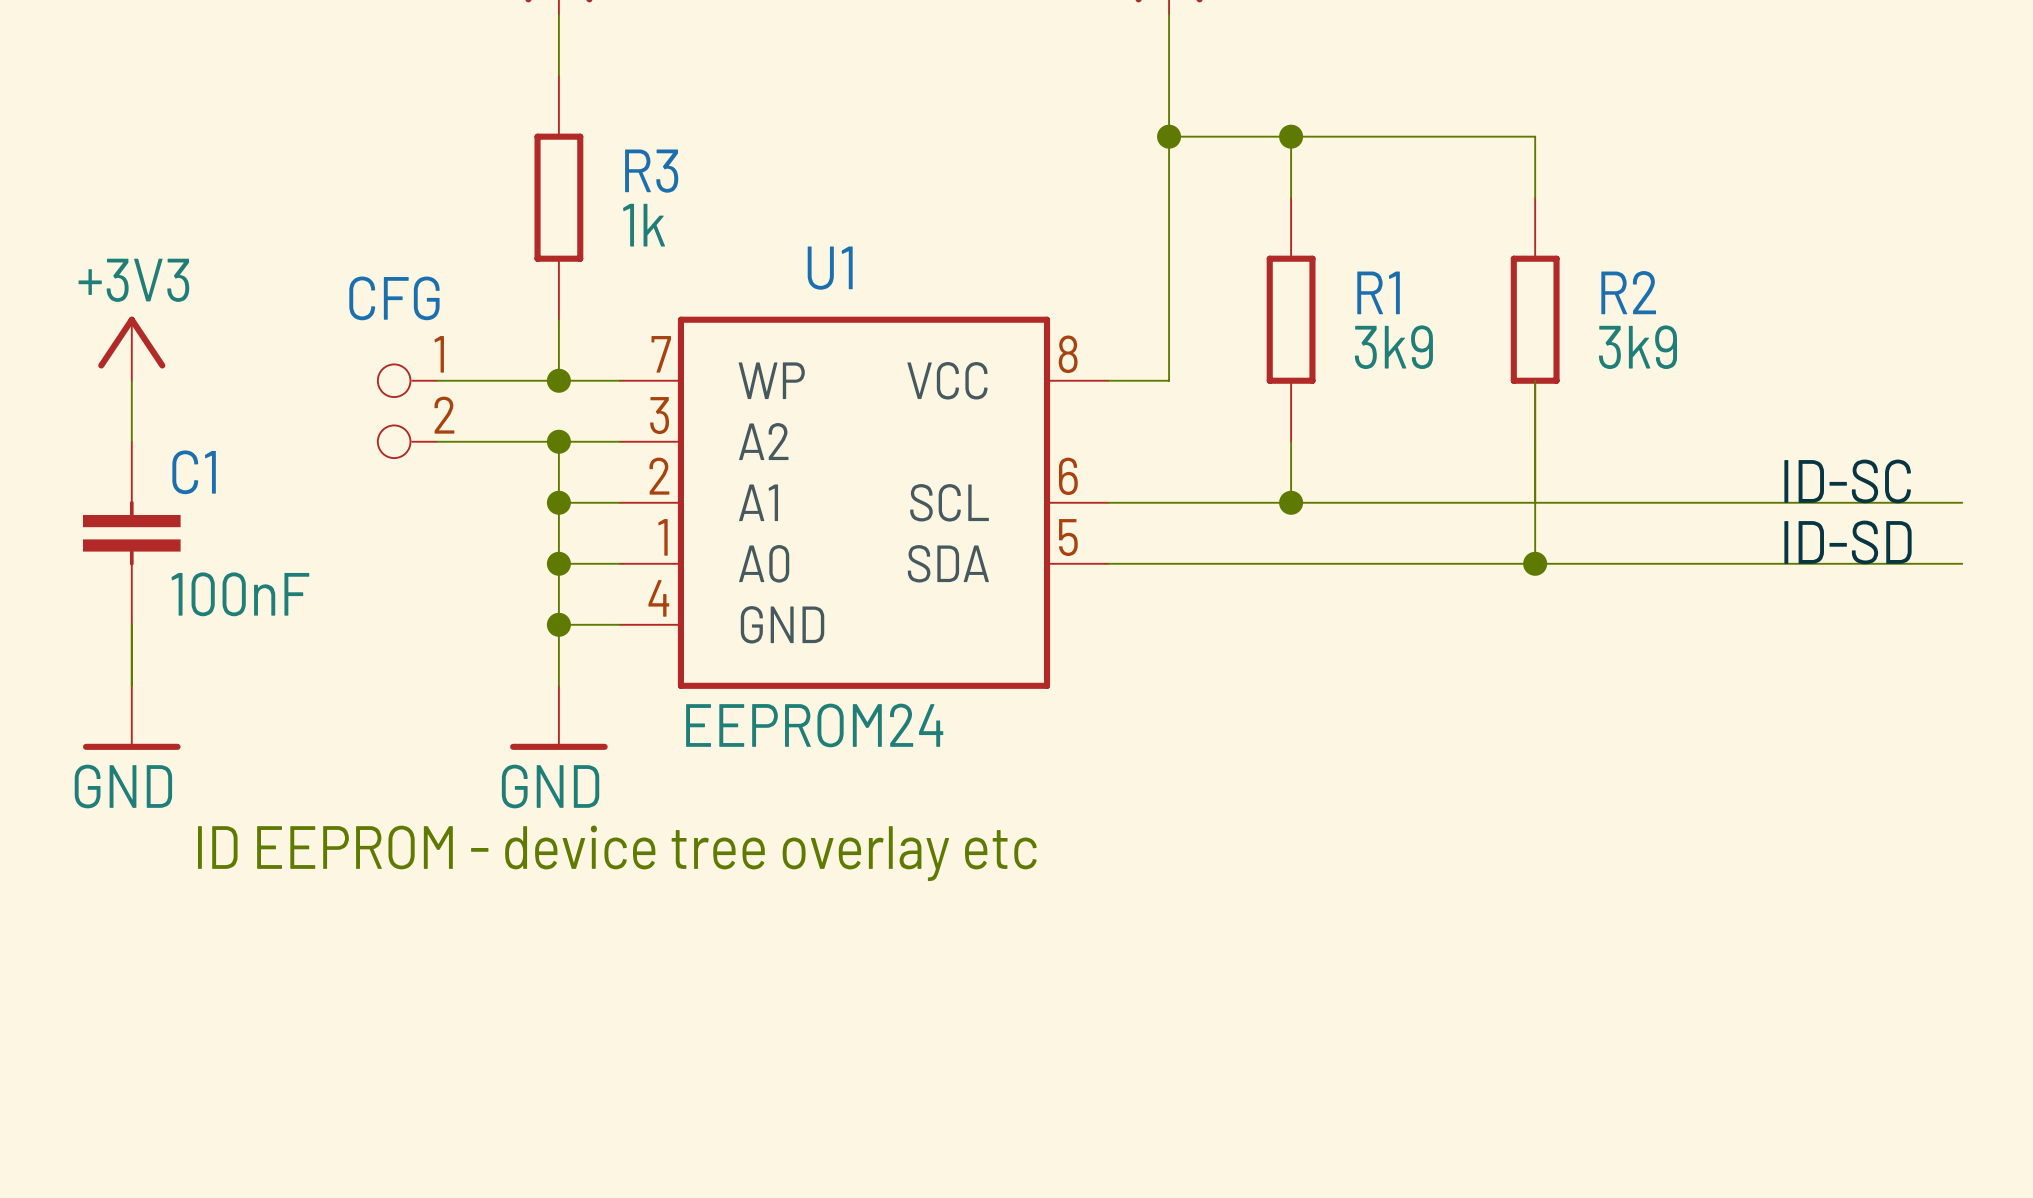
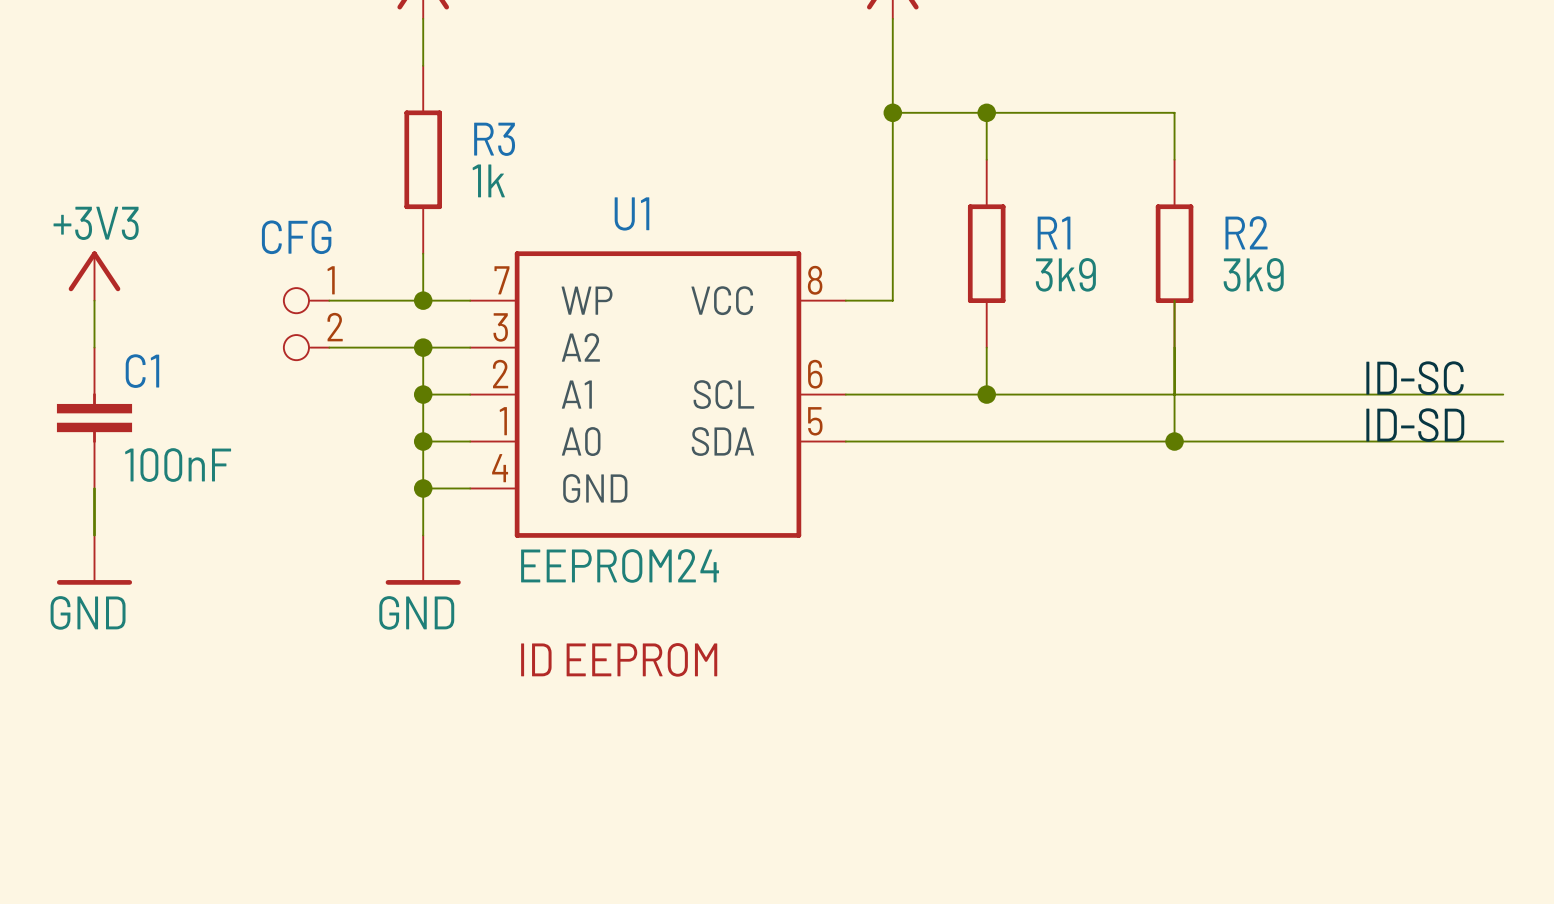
text: none -> ID EEPROM (619, 659)
text: ID EEPROM - device tree overlay etc (617, 853) -> none

